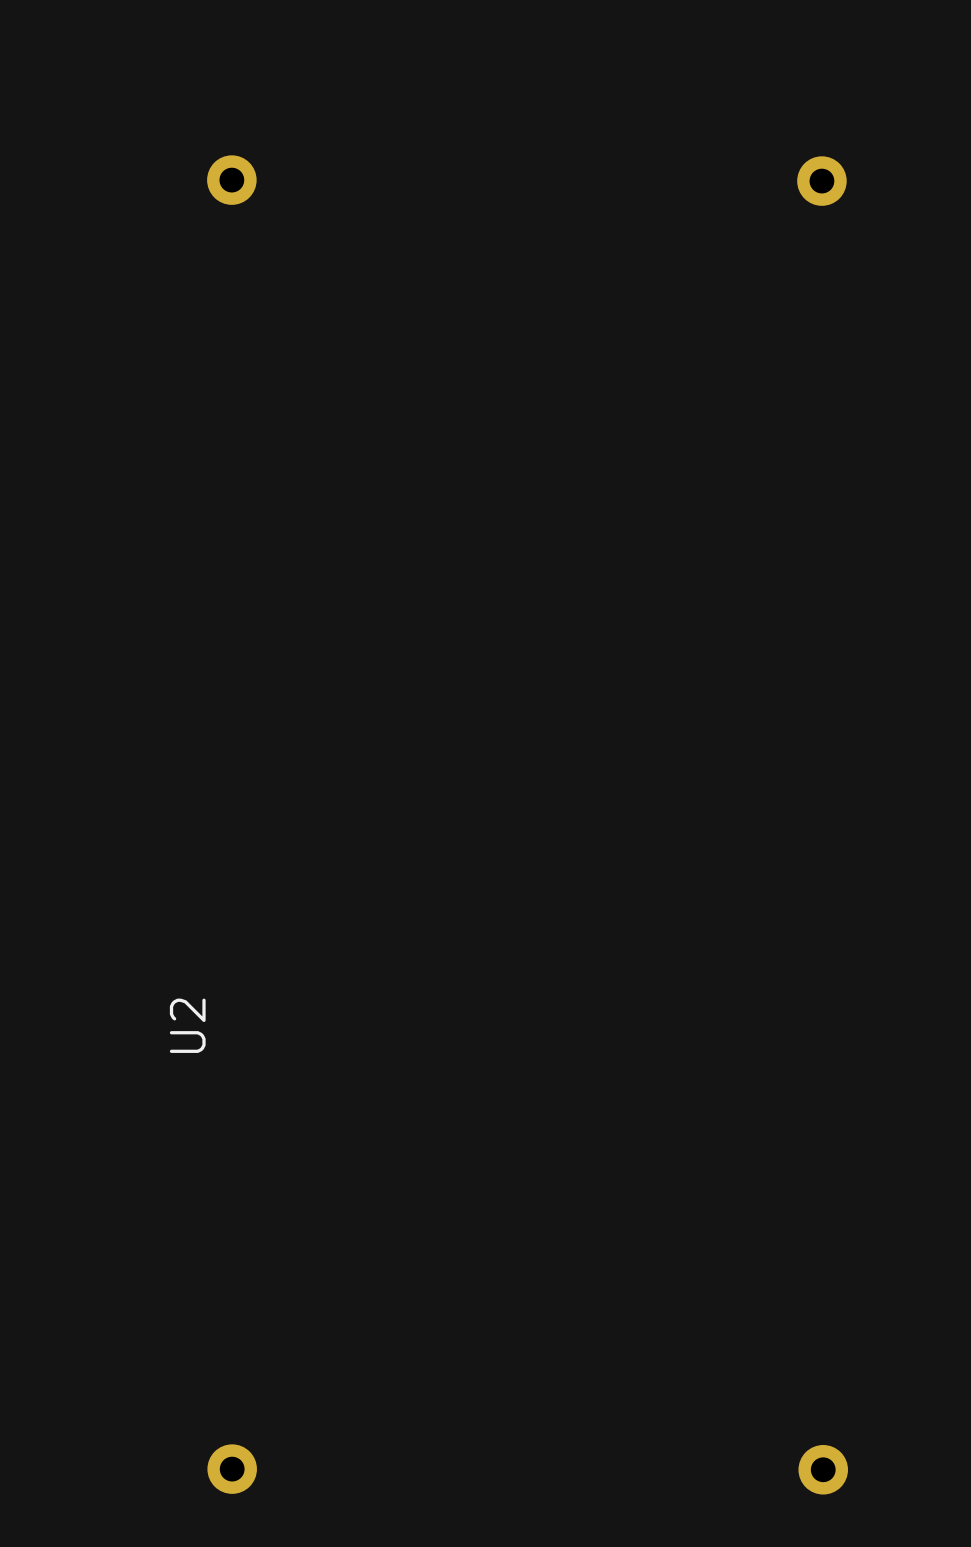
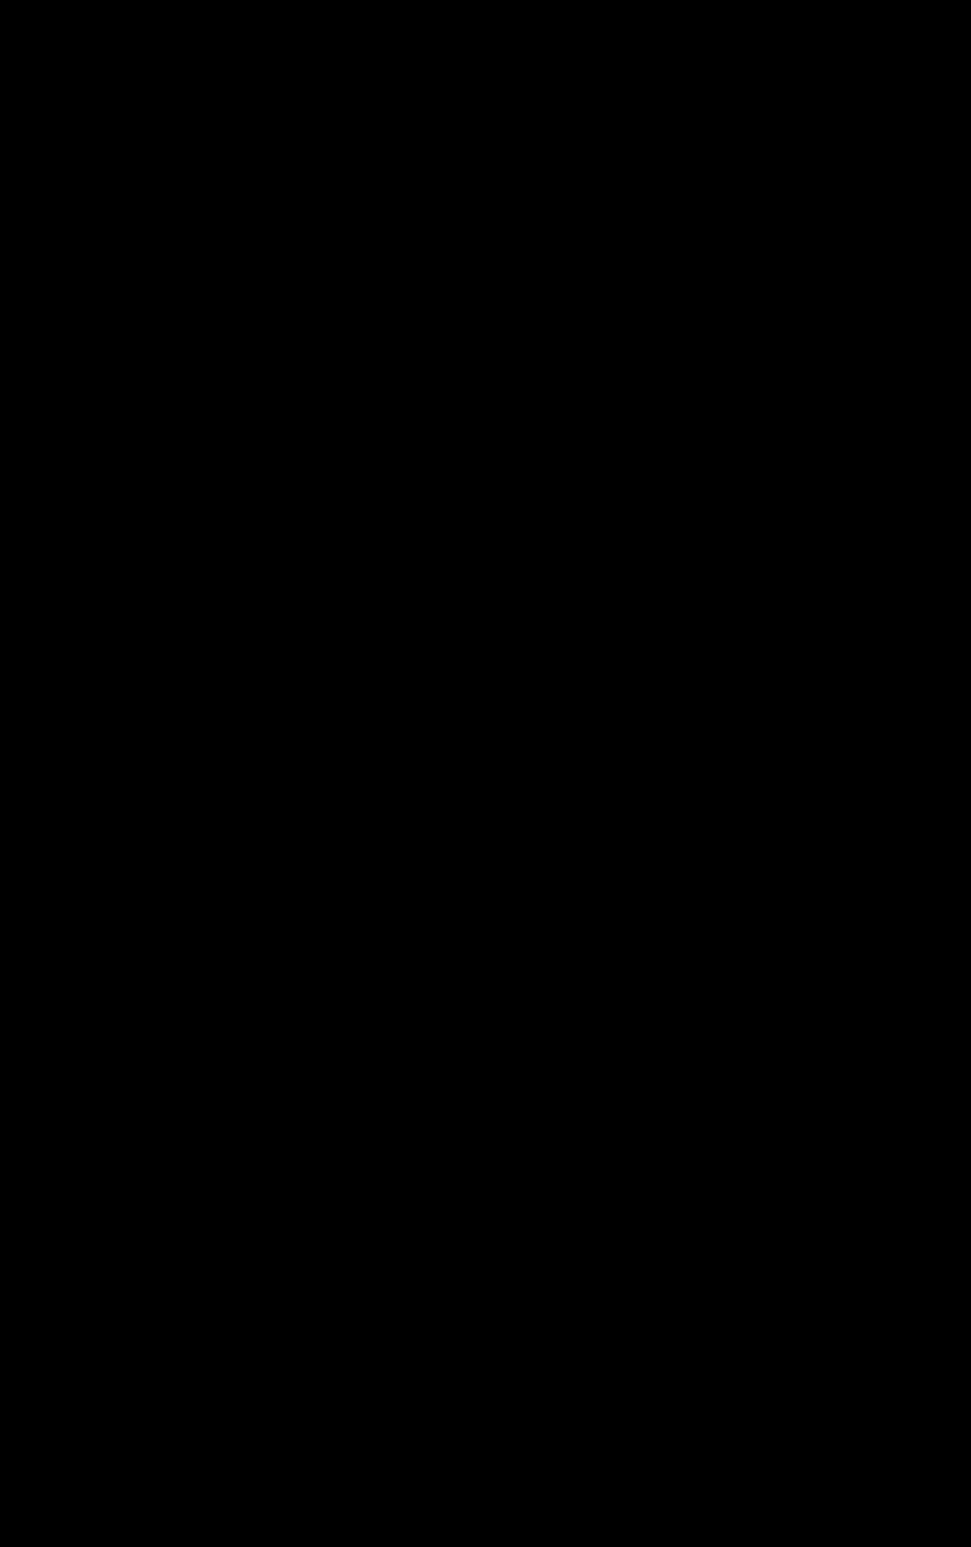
U2: (527, 824) -> none

